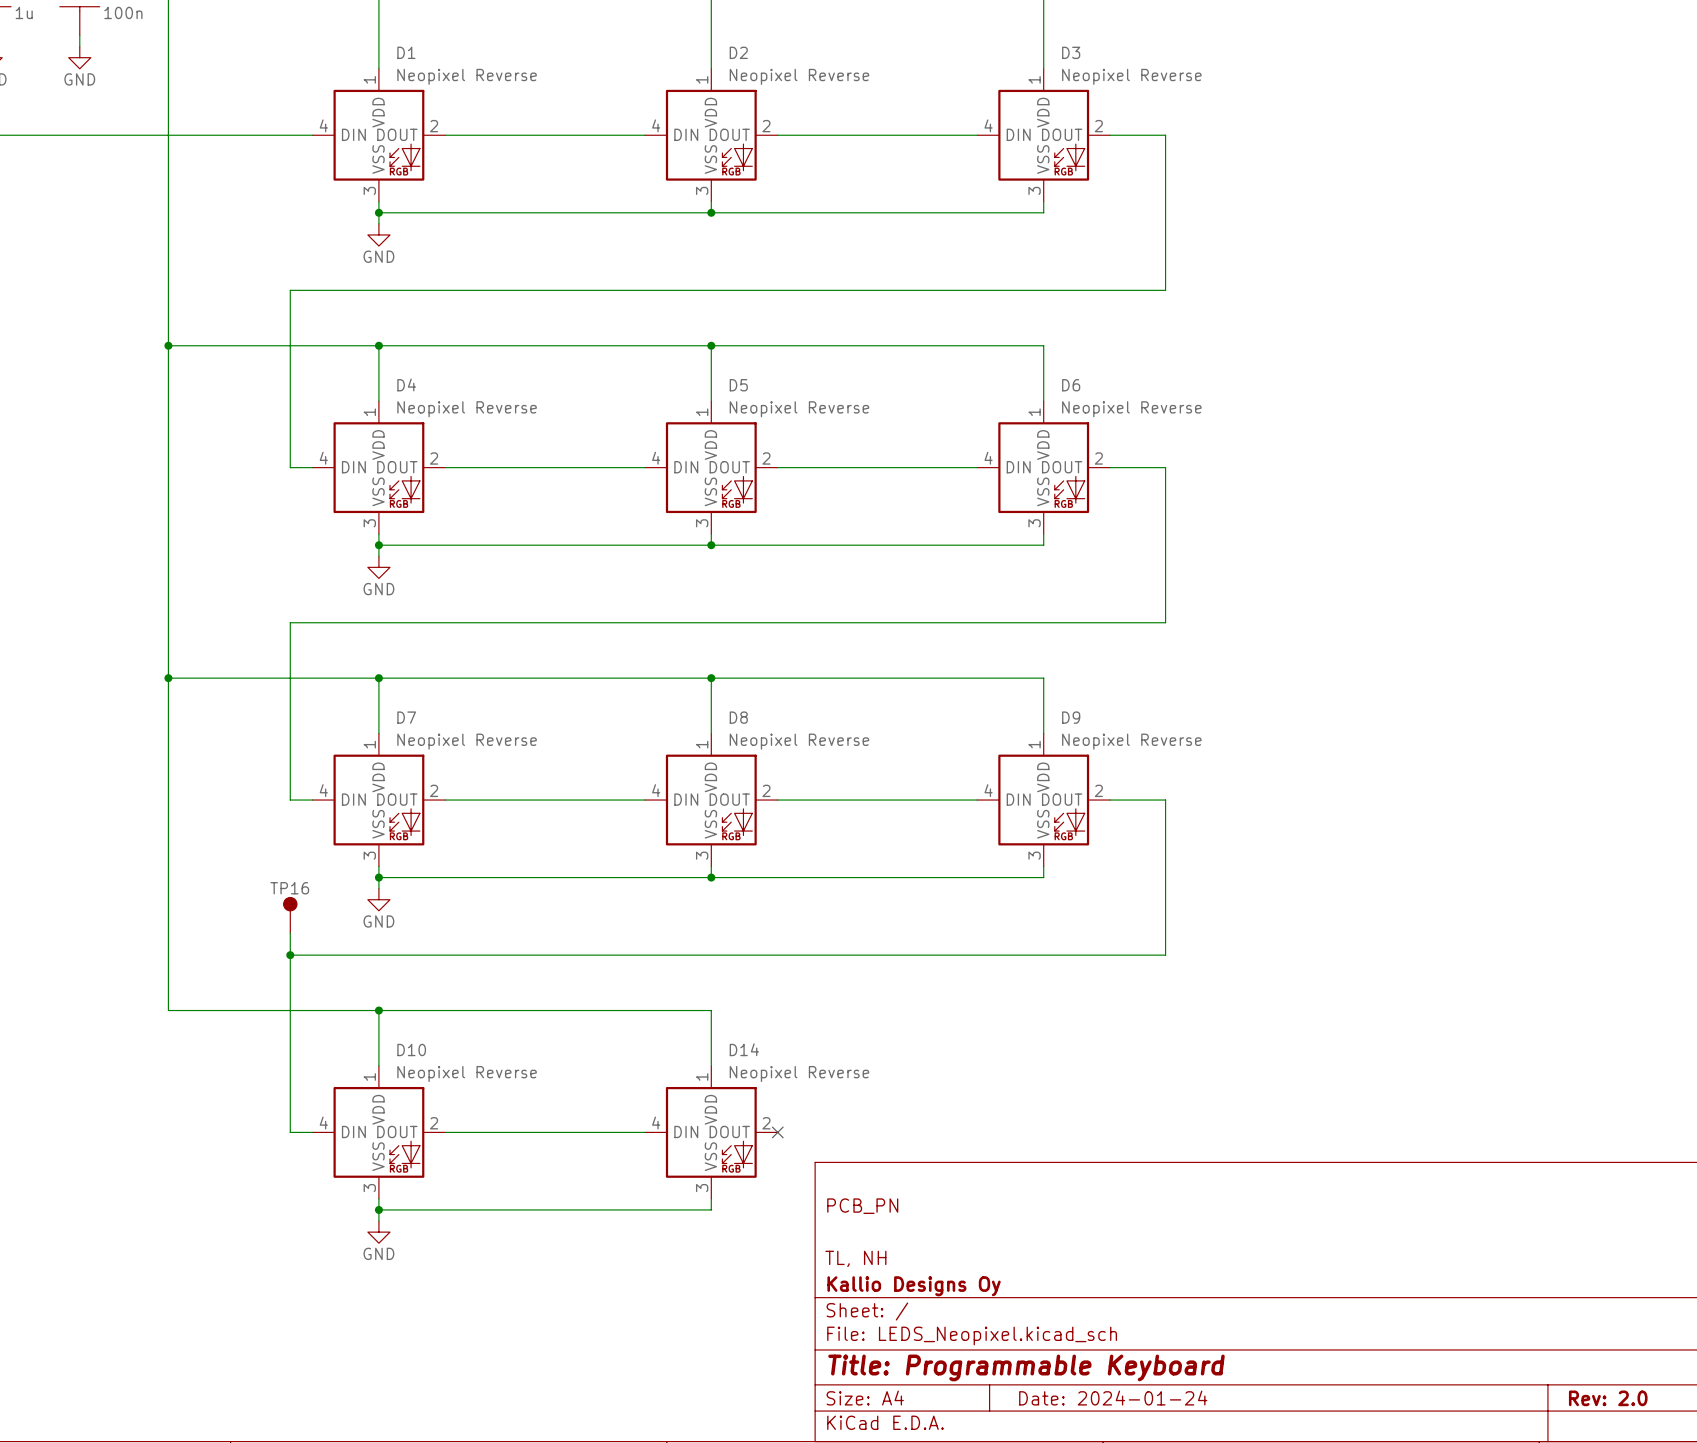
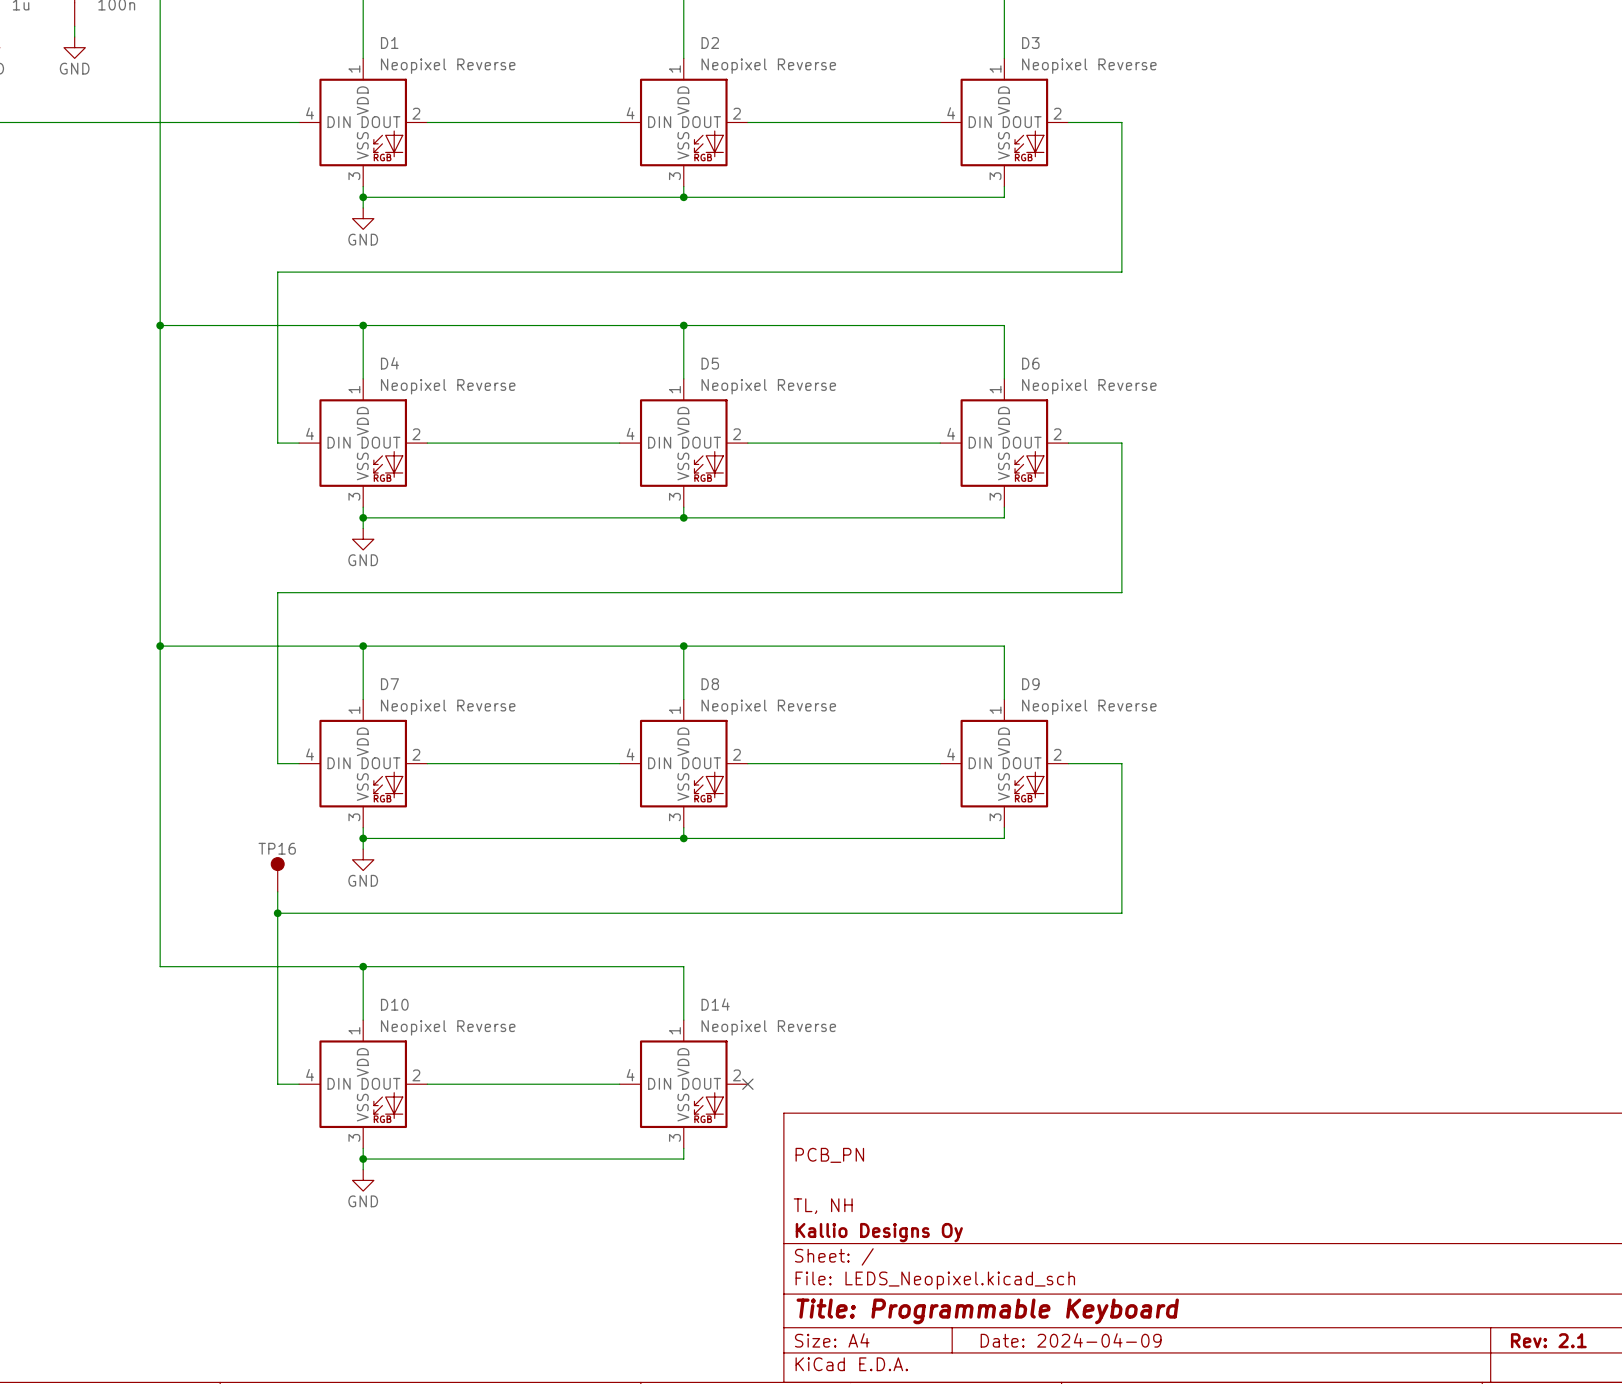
title block: Date: 2024-01-24 (1113, 1398) -> Date: 2024-04-09 (1071, 1340)
title block: Rev: 2.0 (1608, 1398) -> Rev: 2.1 (1548, 1340)

